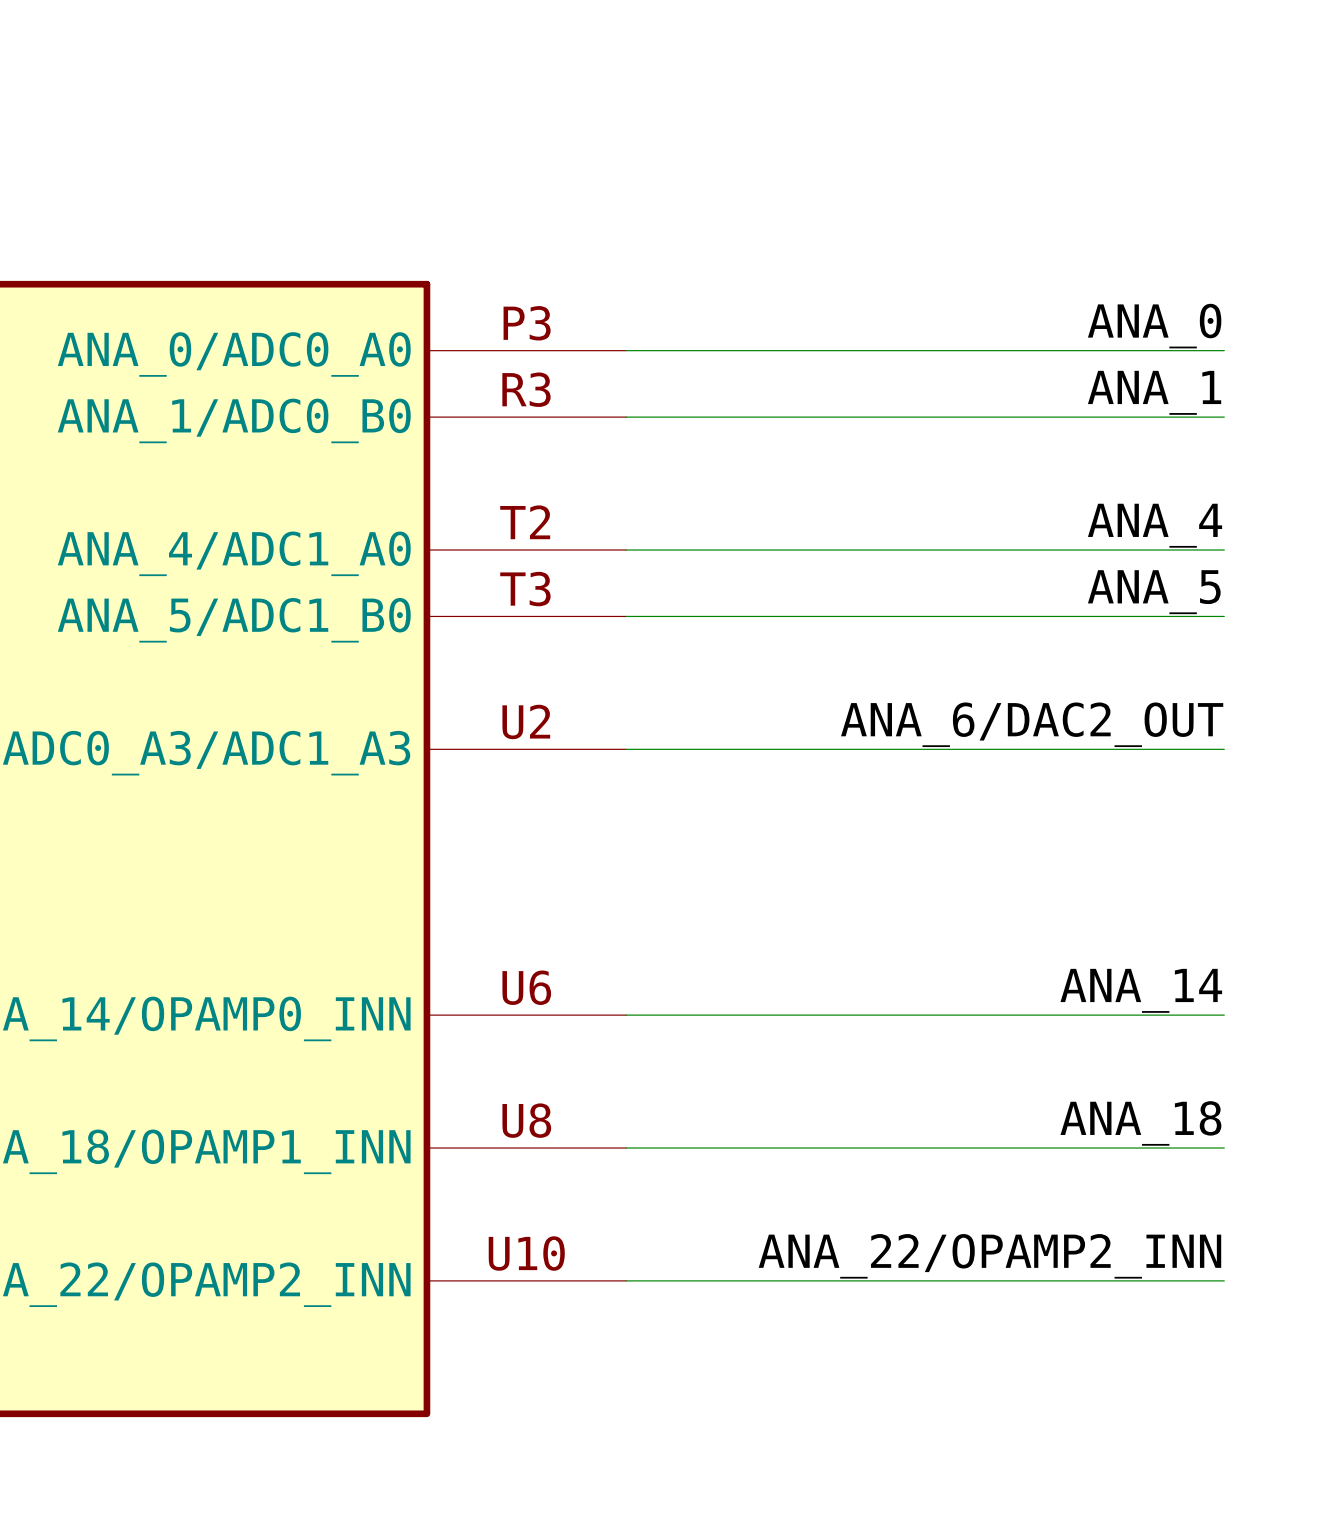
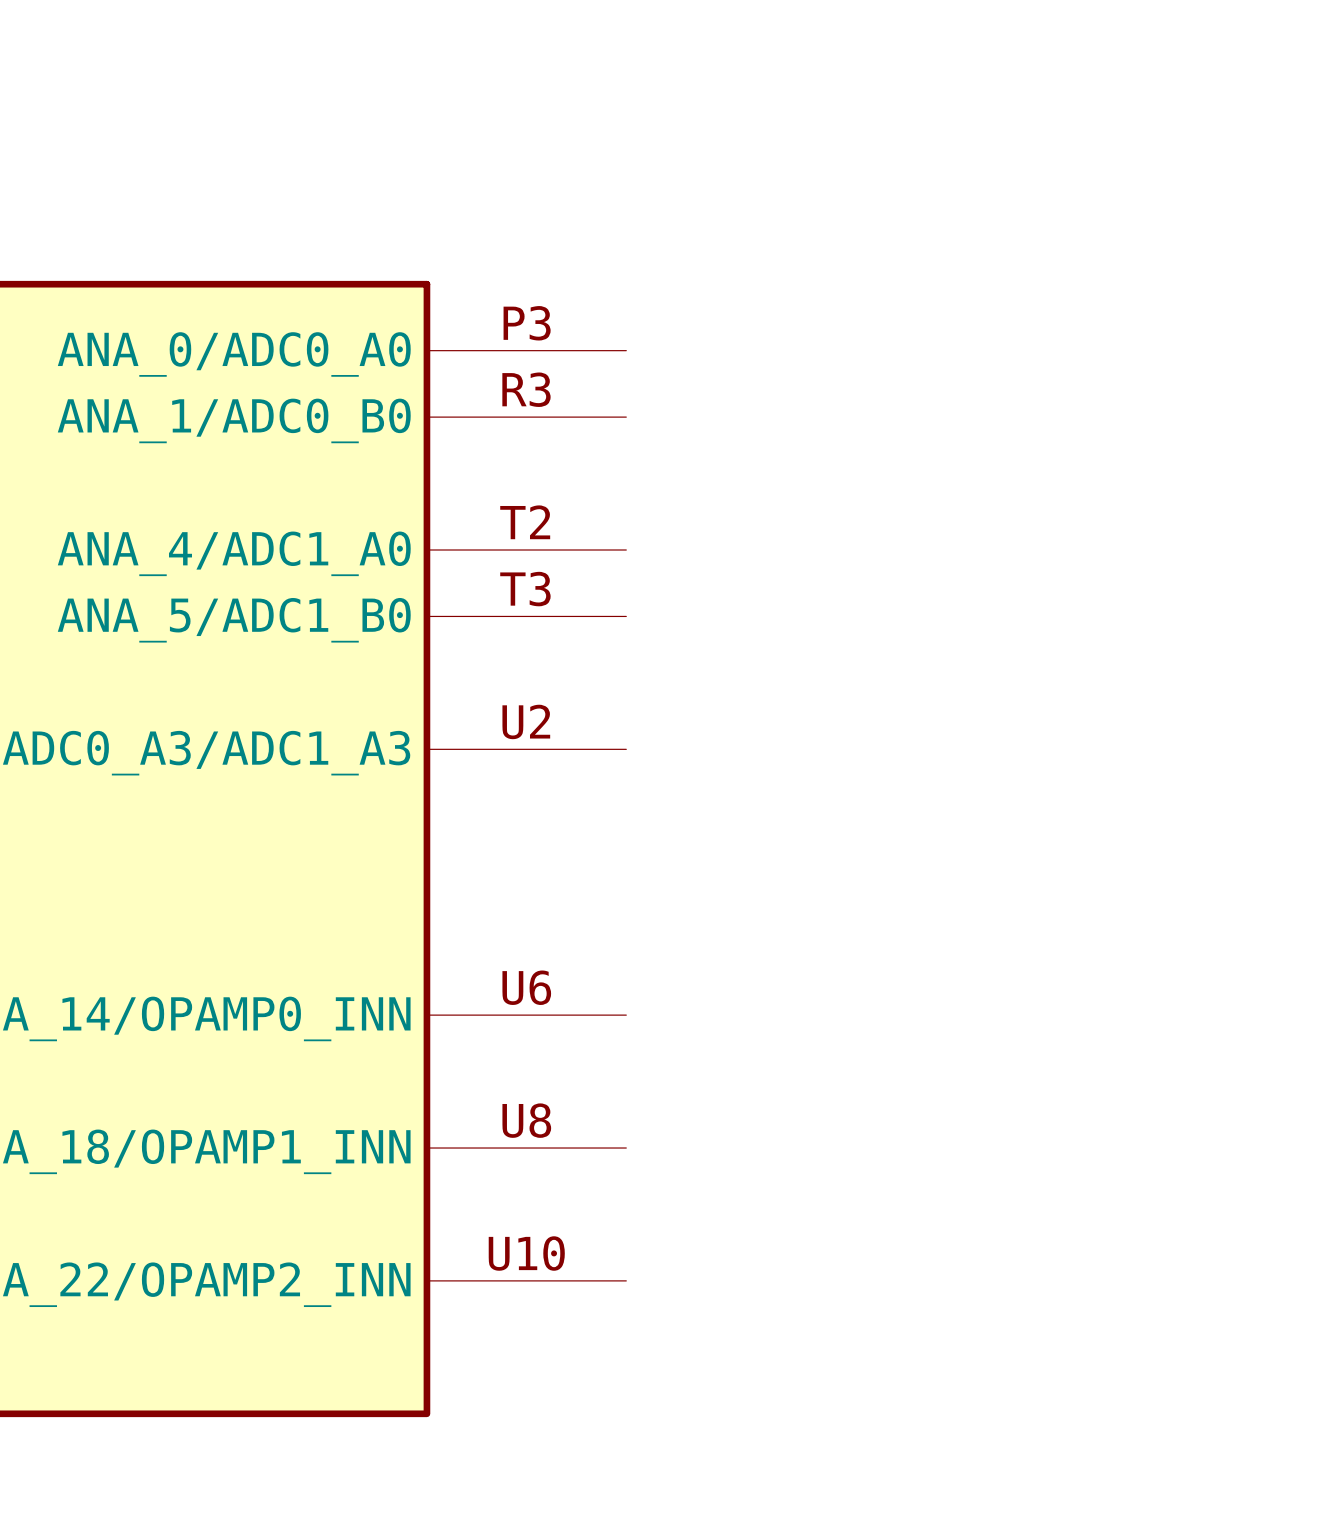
label: ANA_0 (1154, 326) -> none
wire: (626, 350) (1224, 350) -> none
label: ANA_1 (1154, 392) -> none
wire: (626, 417) (1224, 417) -> none
label: ANA_4 (1155, 525) -> none
wire: (626, 550) (1224, 550) -> none
label: ANA_5 (1154, 592) -> none
wire: (626, 616) (1224, 616) -> none
label: ANA_6/DAC2_OUT (1032, 724) -> none
wire: (626, 749) (1224, 749) -> none
label: ANA_14 (1141, 990) -> none
wire: (626, 1015) (1224, 1015) -> none
label: ANA_18 (1140, 1123) -> none
wire: (626, 1148) (1224, 1148) -> none
label: ANA_22/OPAMP2_INN (989, 1256) -> none
wire: (626, 1280) (1224, 1280) -> none

